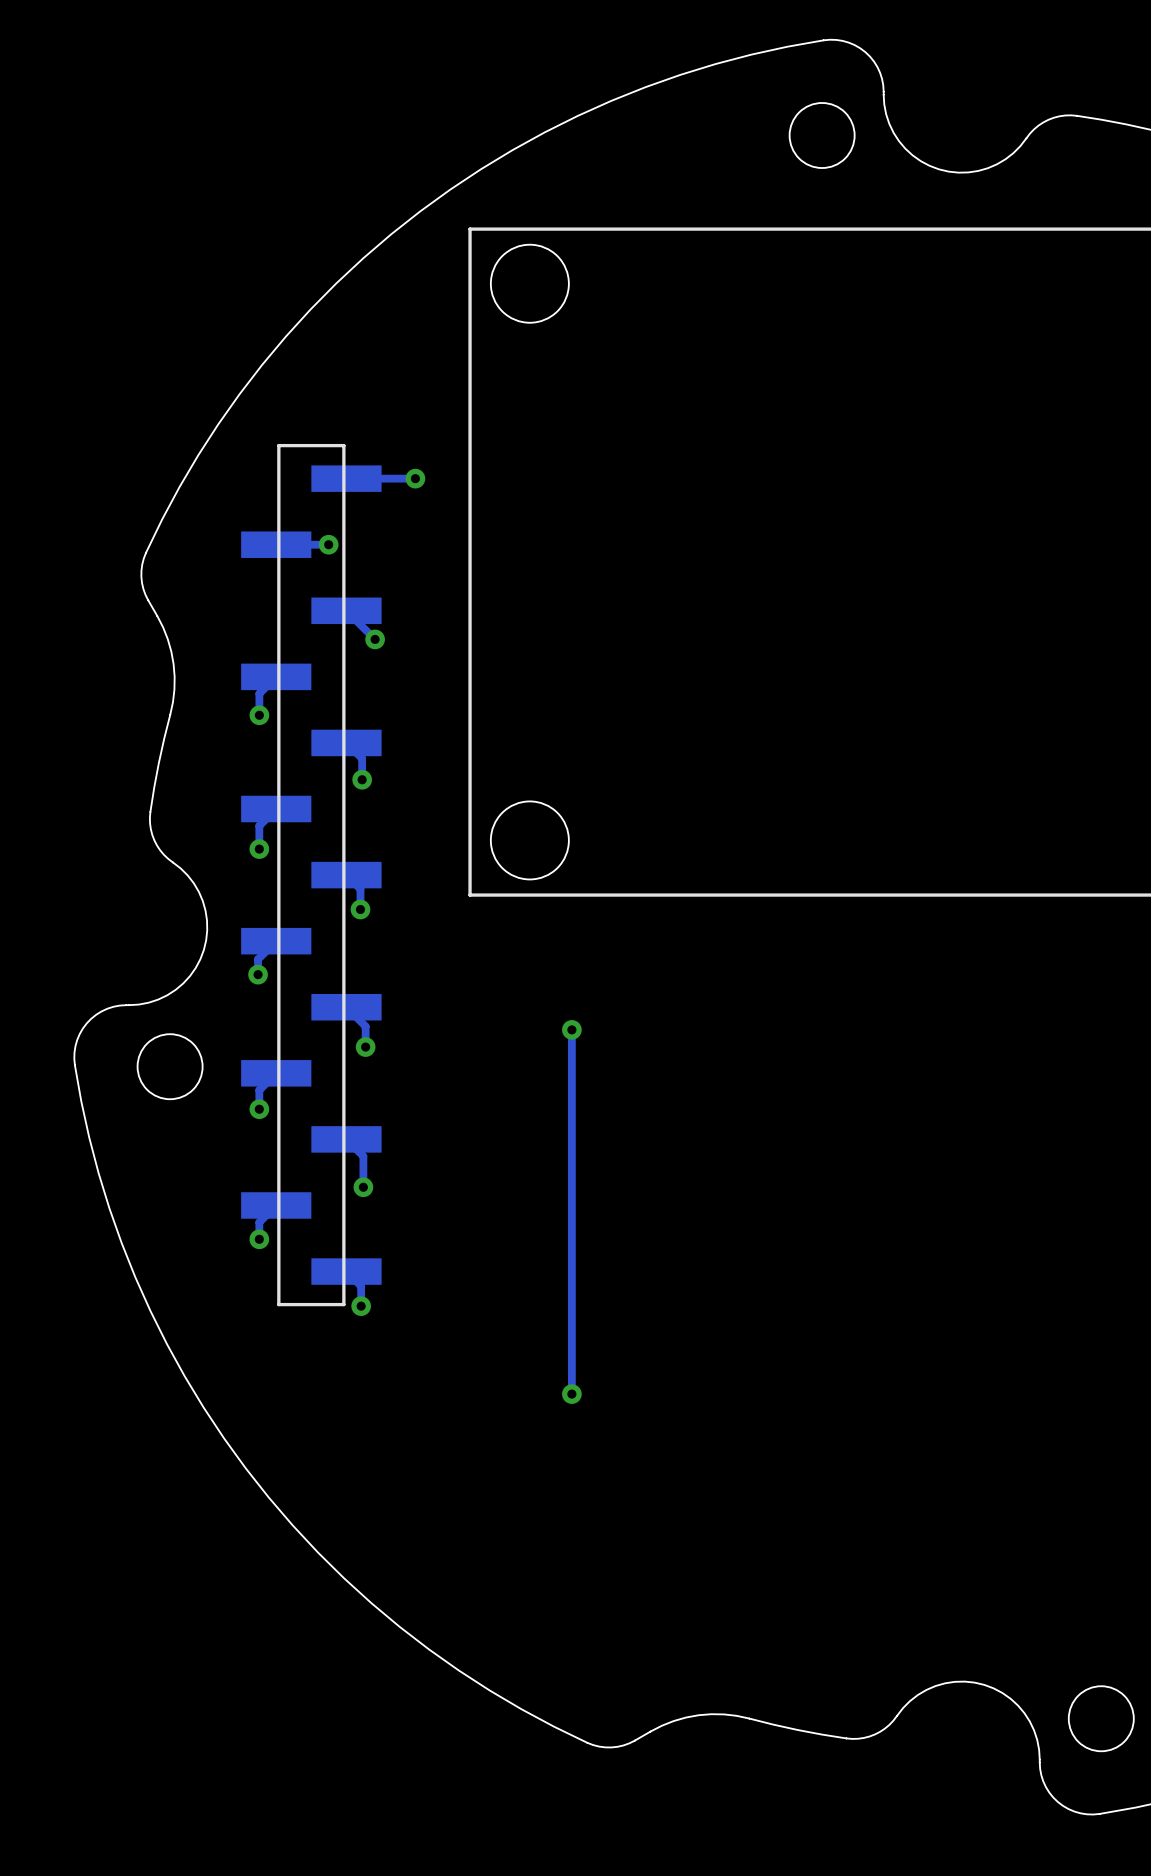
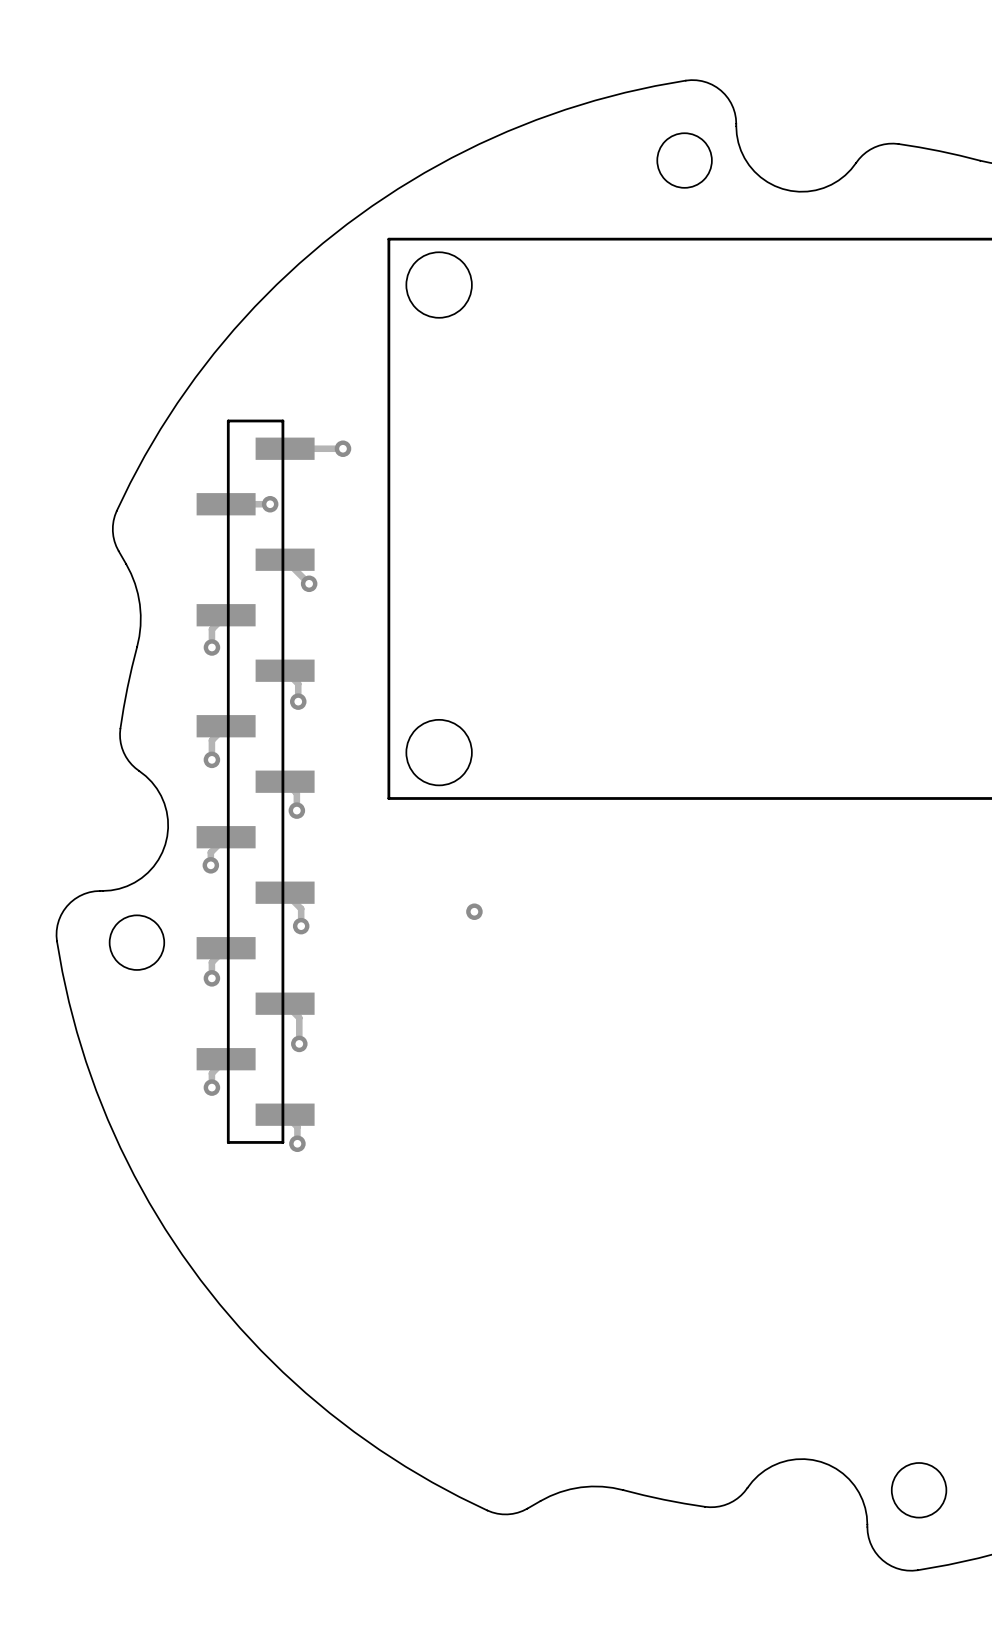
track: (571, 1029) (571, 1394) -> none
via: (571, 1394) -> none

